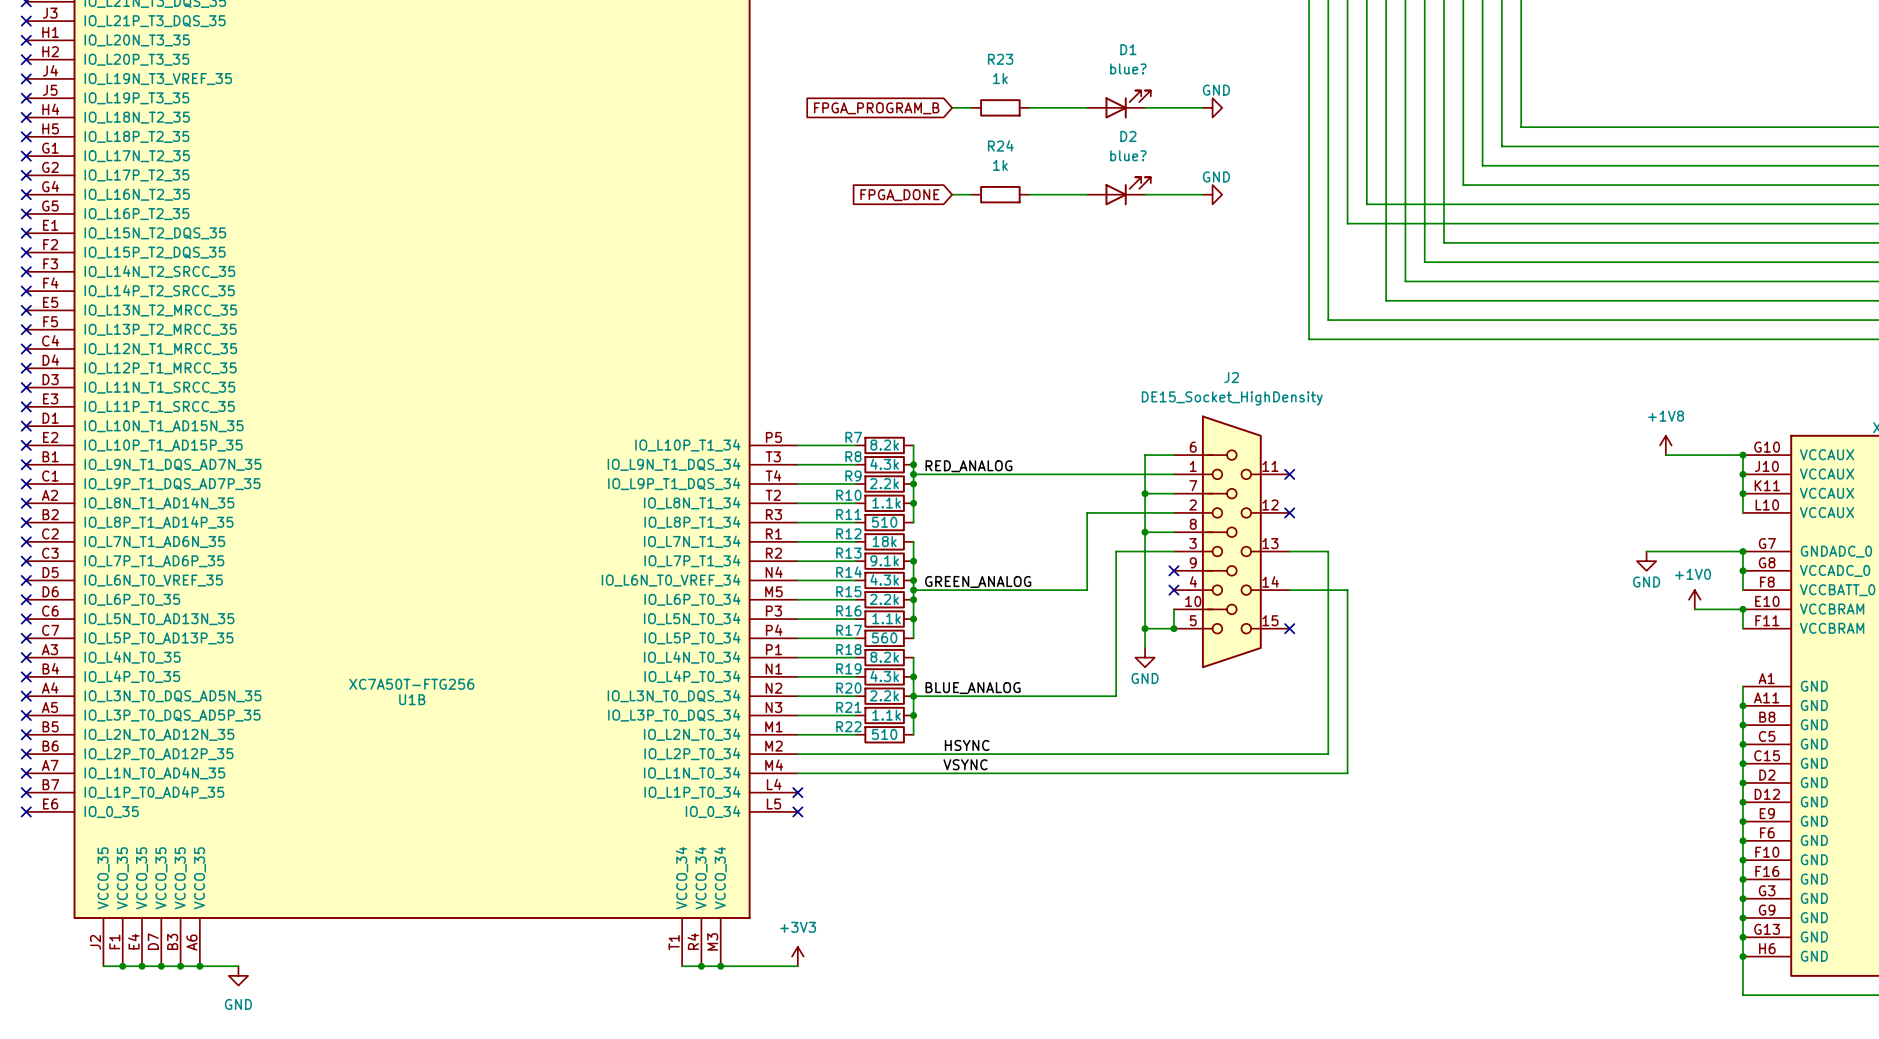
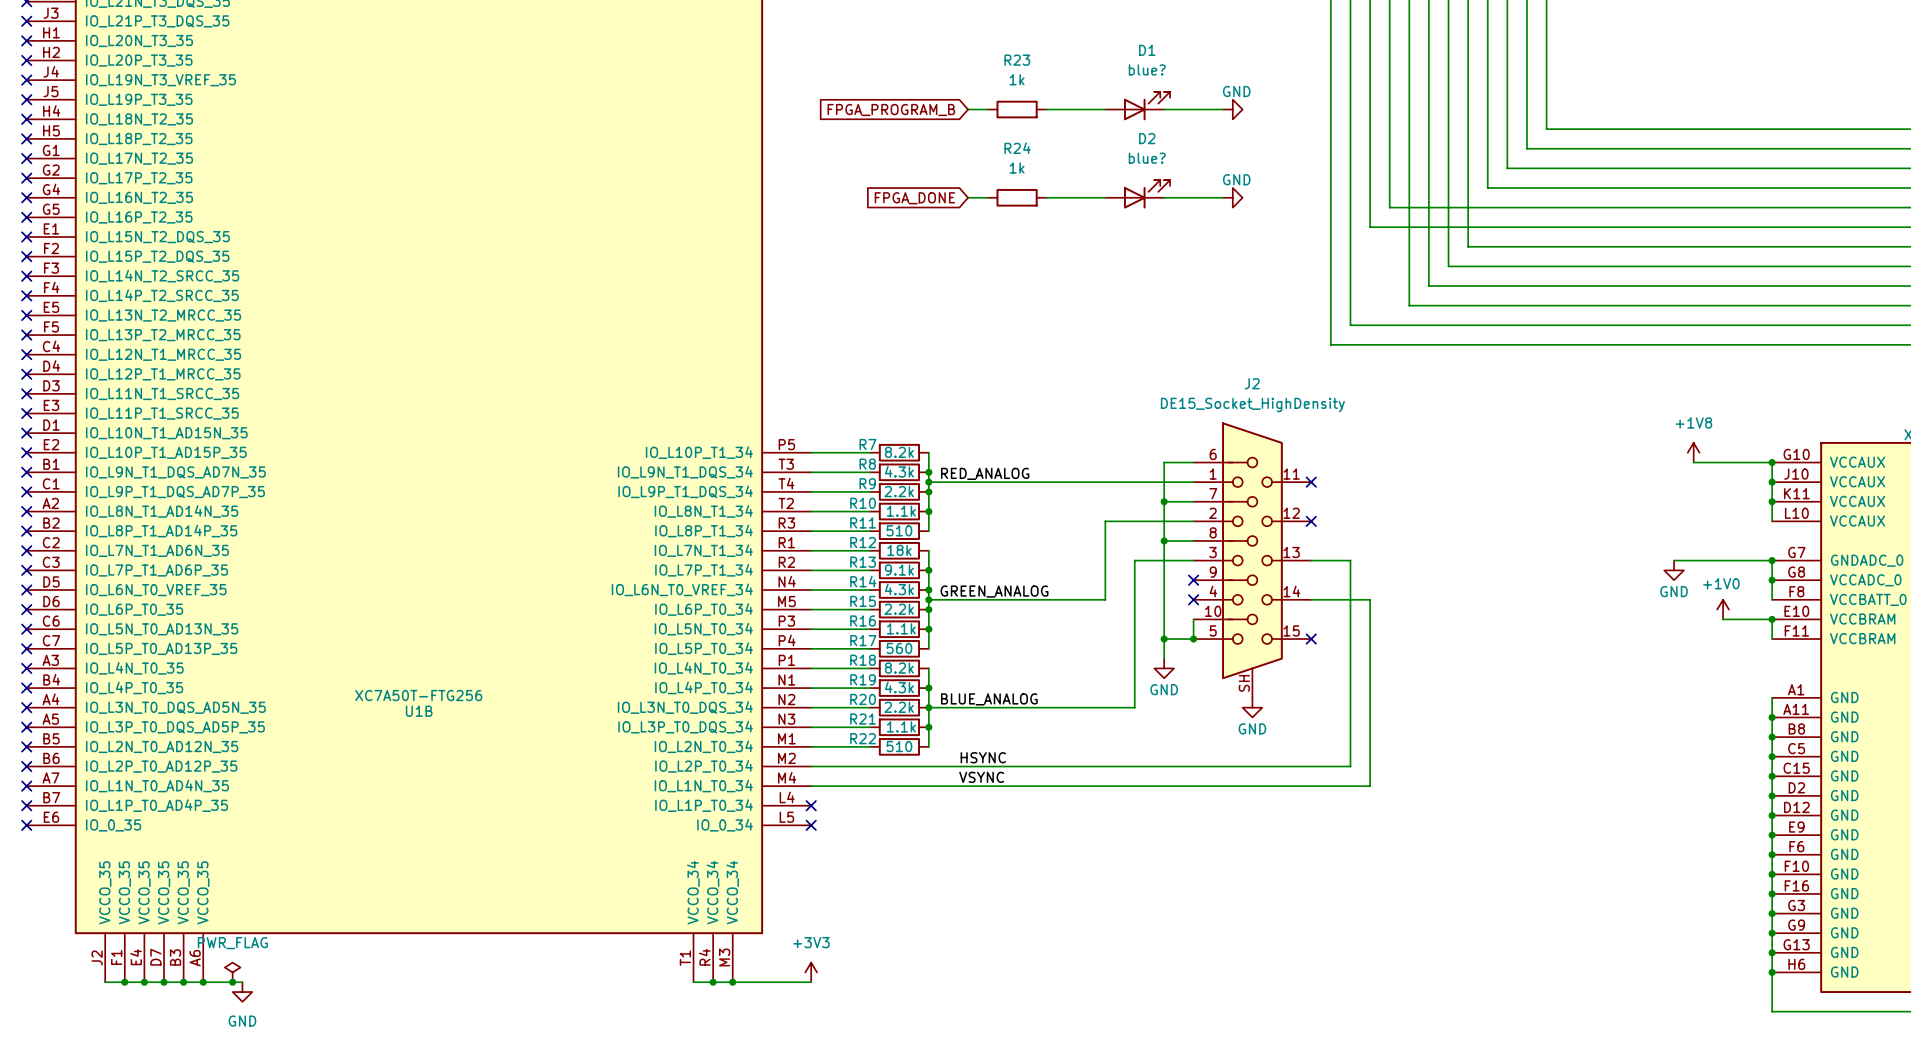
J2 symbol: [1173, 415, 1290, 669] -> [1193, 422, 1312, 698]
power symbol: none -> GND (1252, 707)
power symbol: none -> PWR_FLAG (232, 972)
junction: none -> (232, 982)

